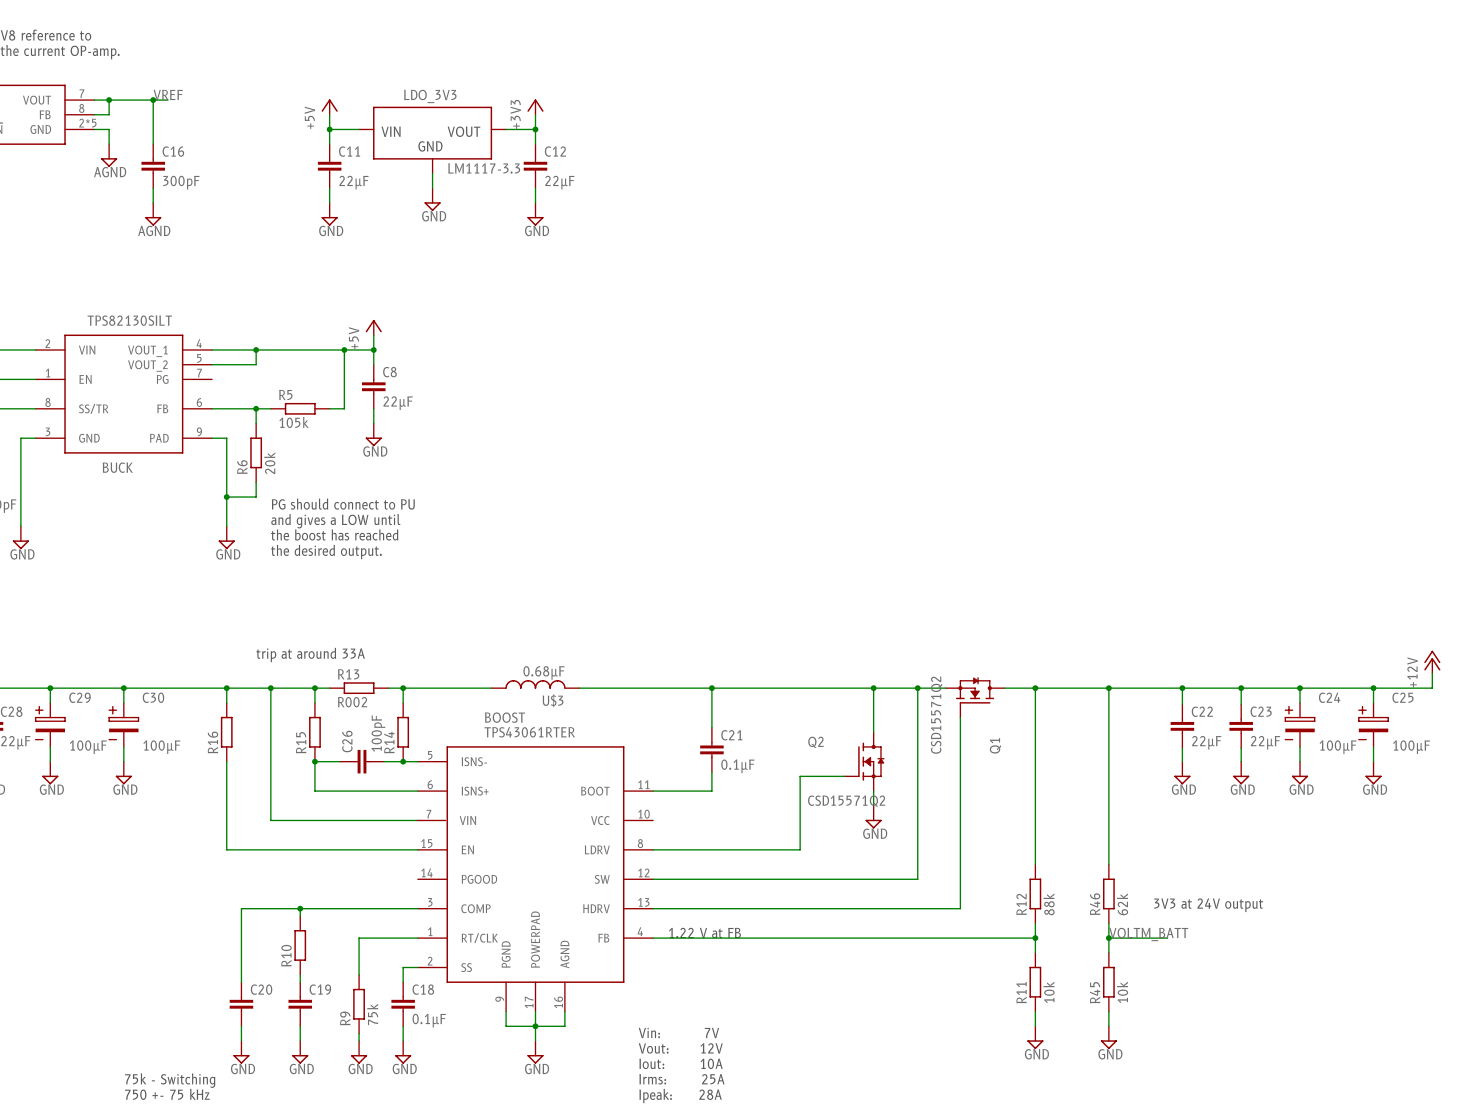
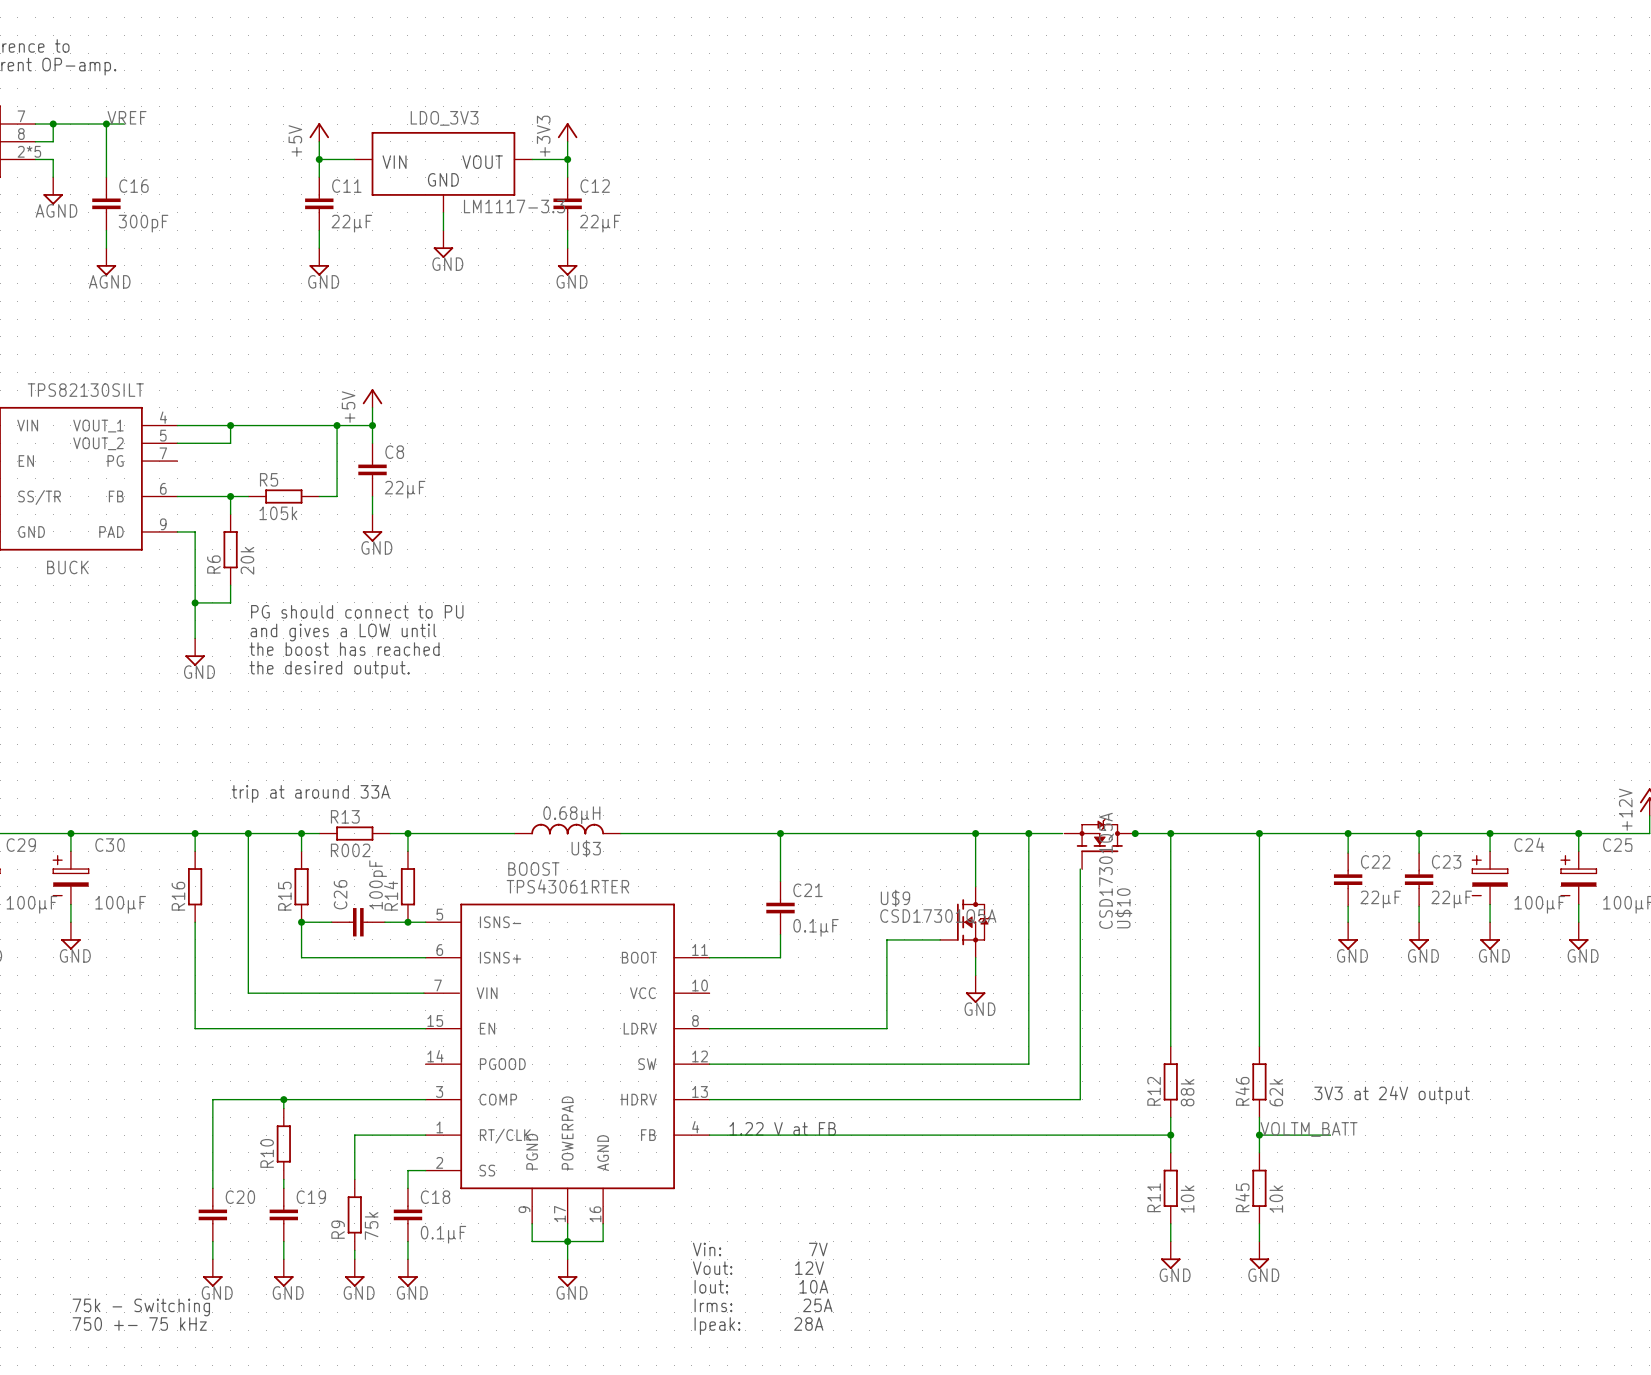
U$3 value: 0.68µF (543, 672) -> 0.68µH (571, 815)
junction: none -> (1135, 833)
U$10: none -> CSD17301Q5A (1099, 843)
Q1: CSD15571Q2 (975, 697) -> none
Q2: CSD15571Q2 (864, 761) -> none
U$9: none -> CSD17301Q5A (965, 922)

